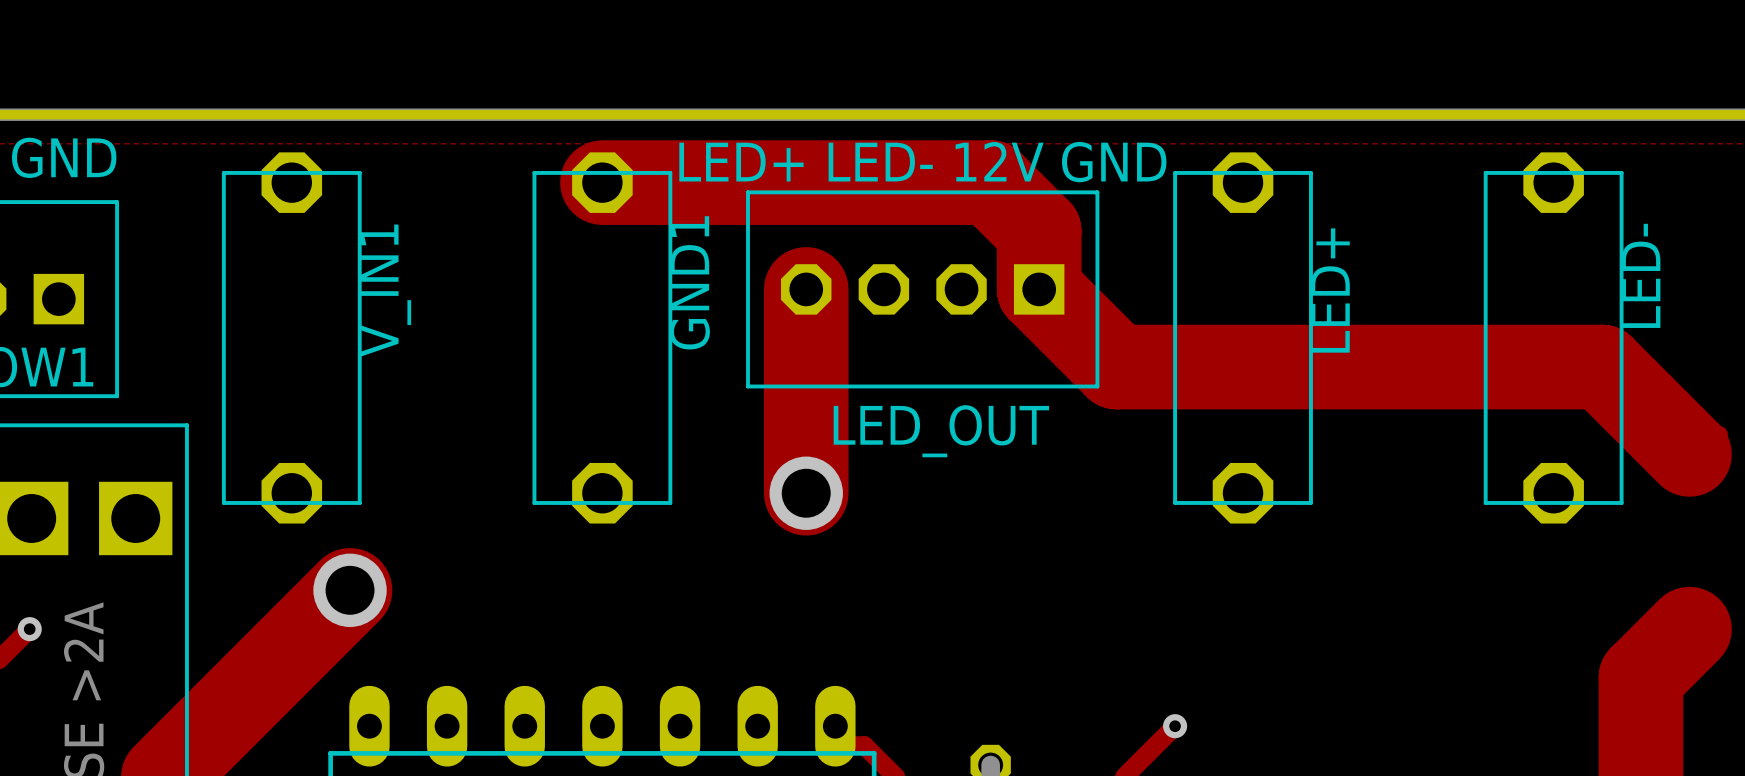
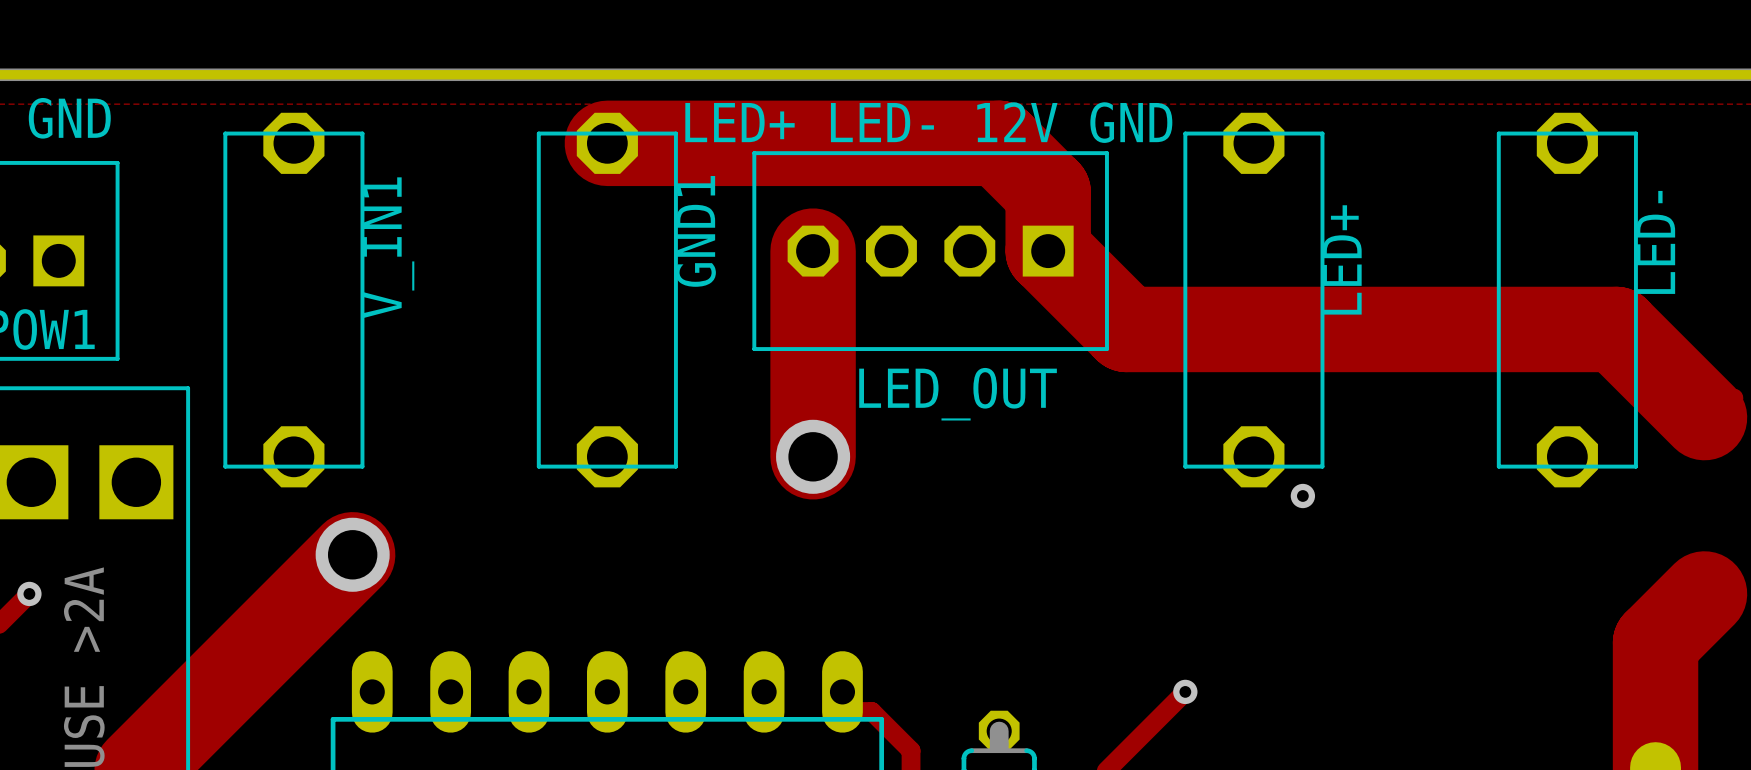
via: none -> (1302, 495)

